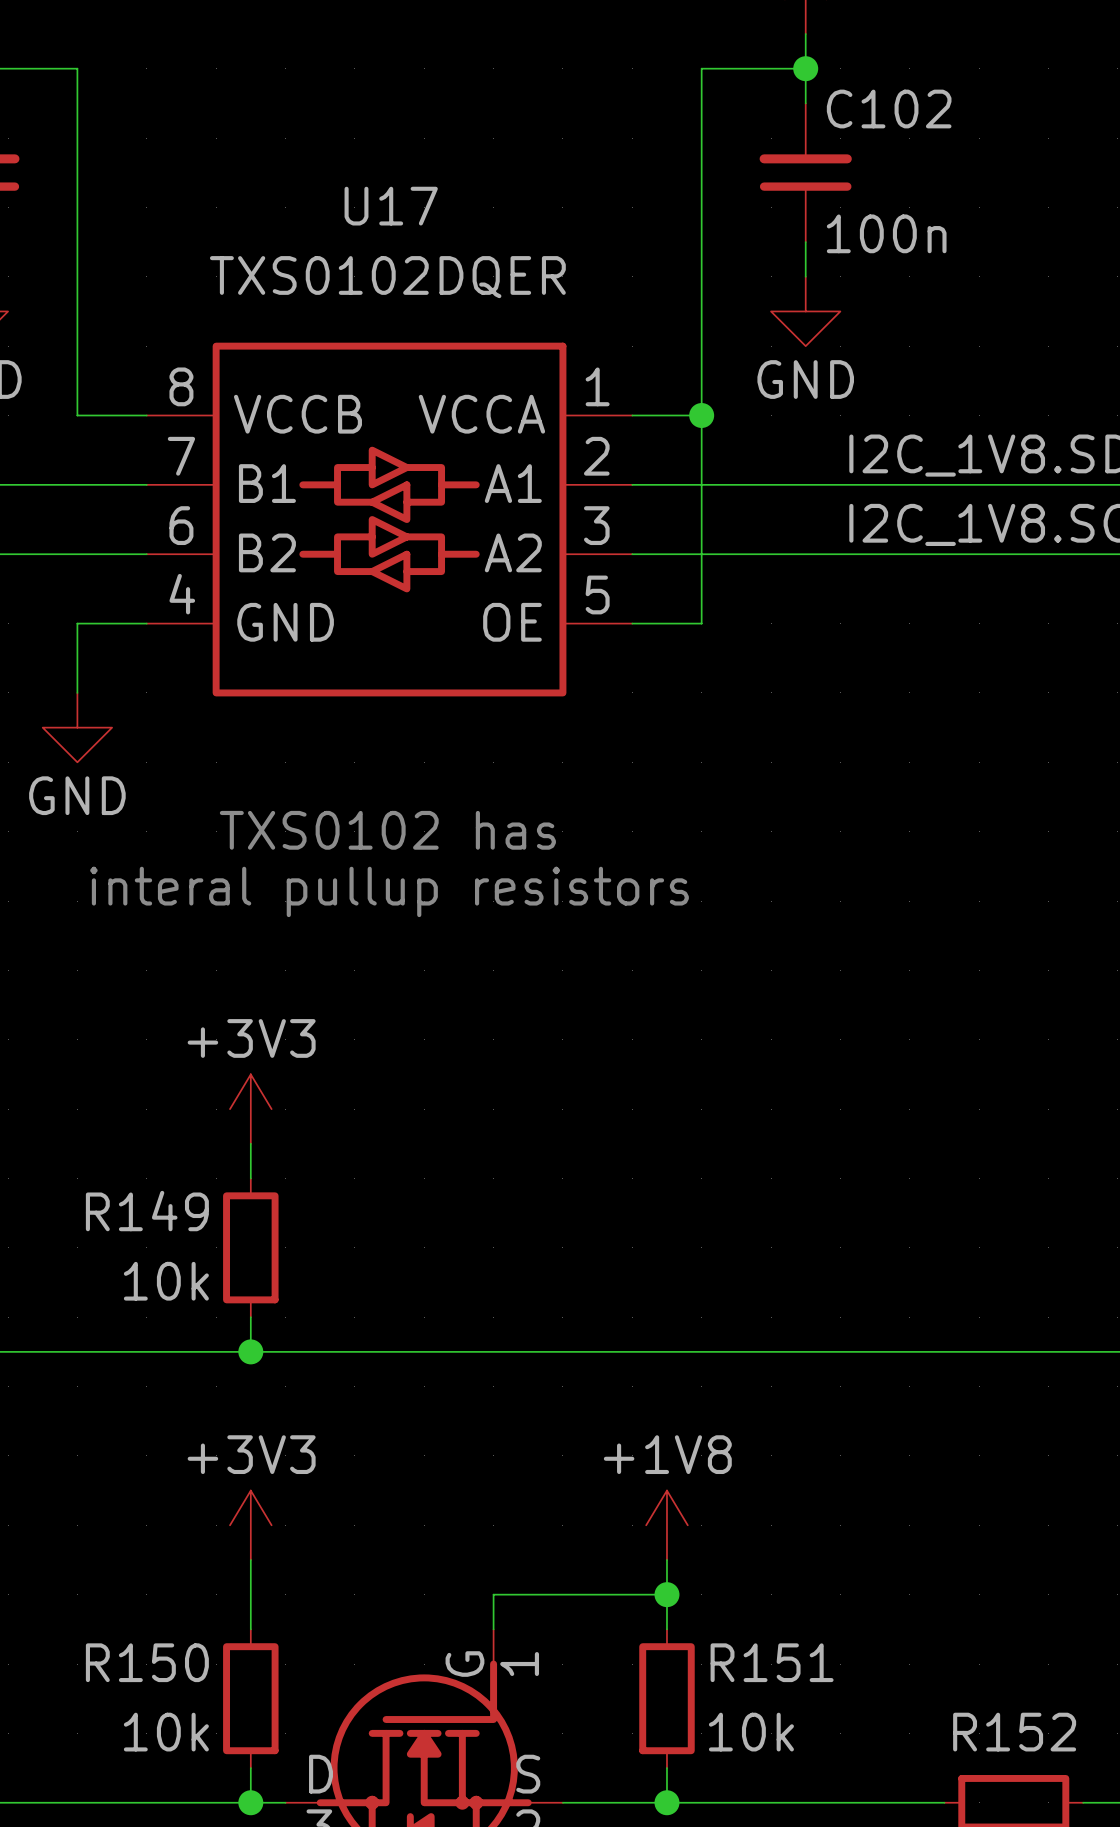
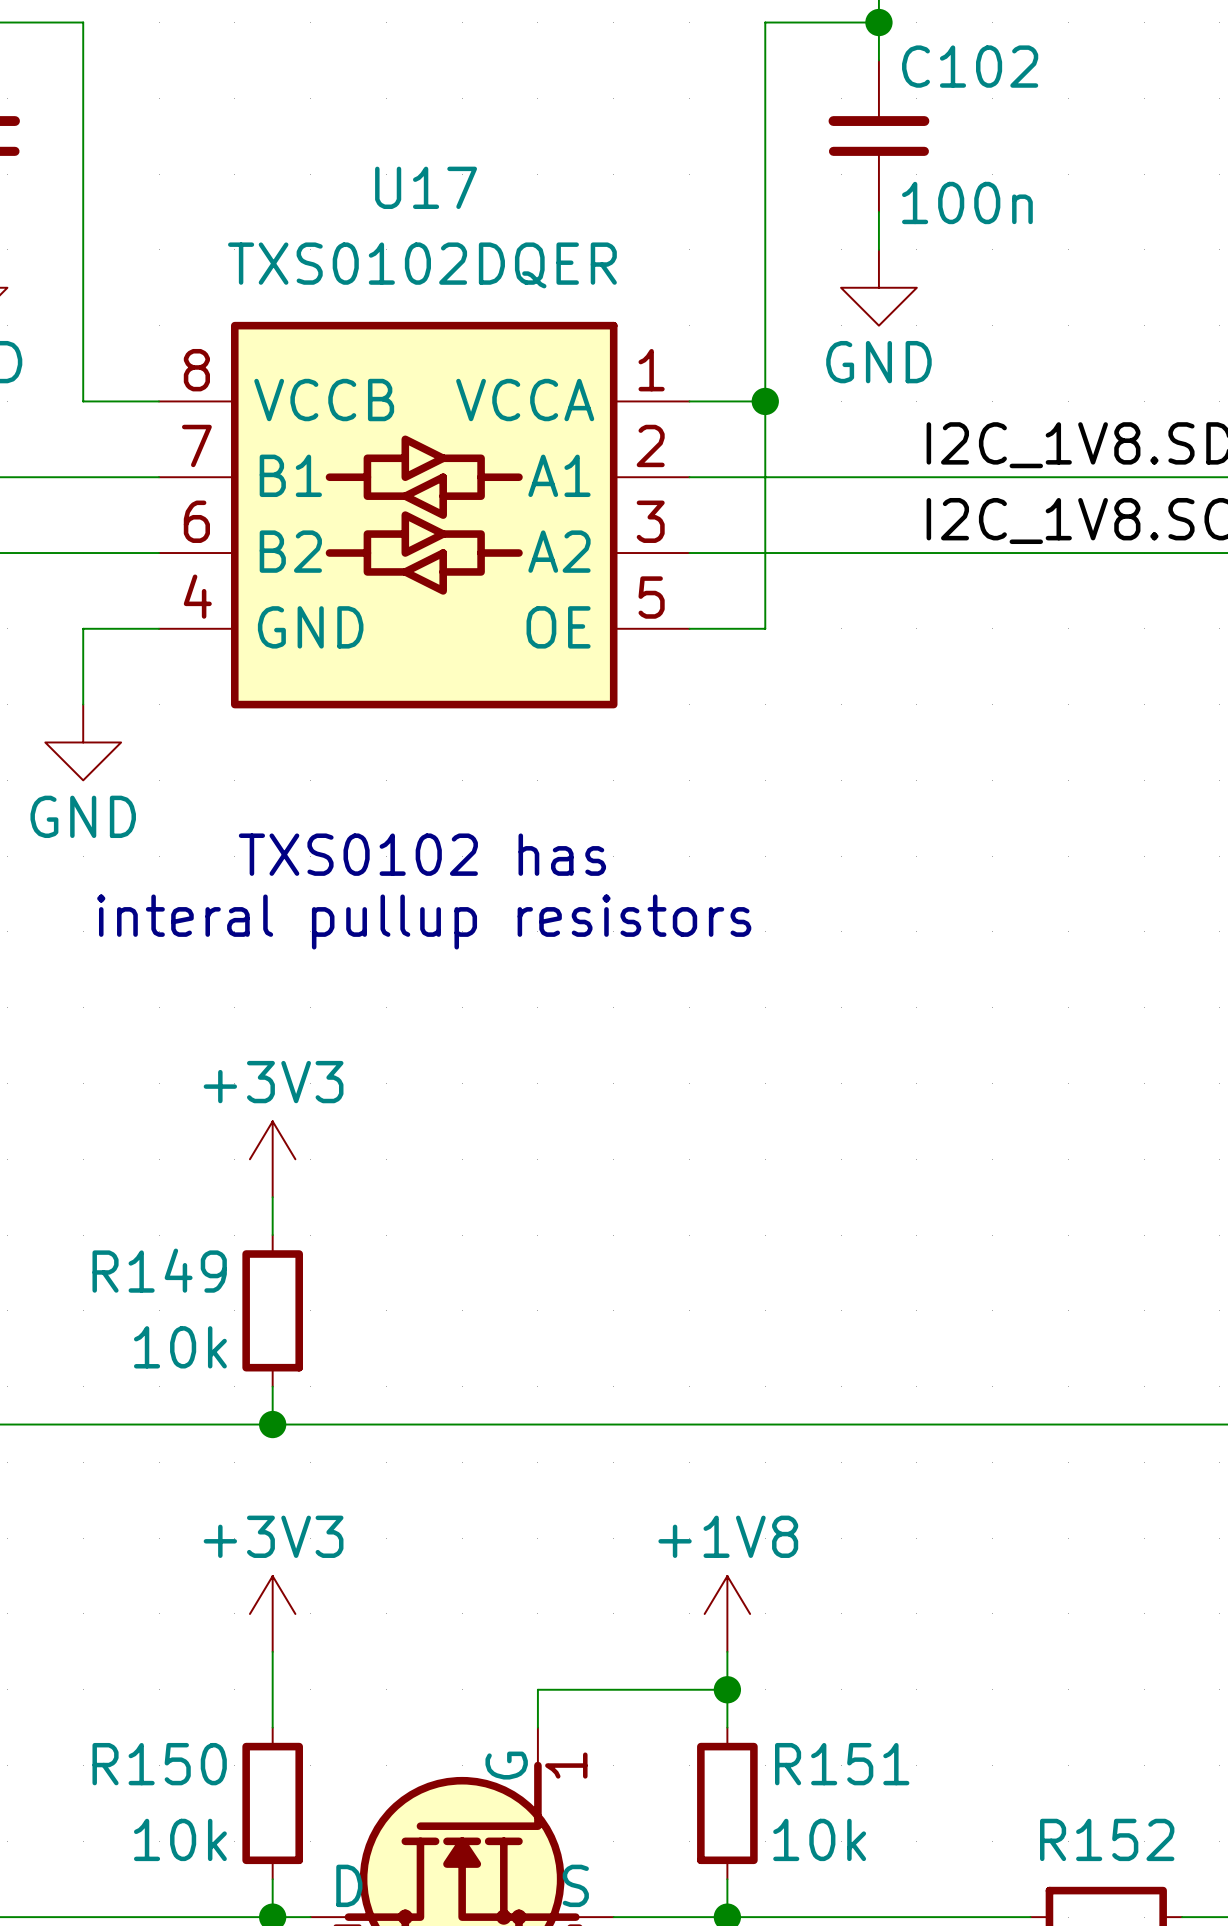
U17 name position: U17 (391, 206) -> U17 (426, 187)
U17 text position: TXS0102DQER (387, 277) -> TXS0102DQER (422, 265)

